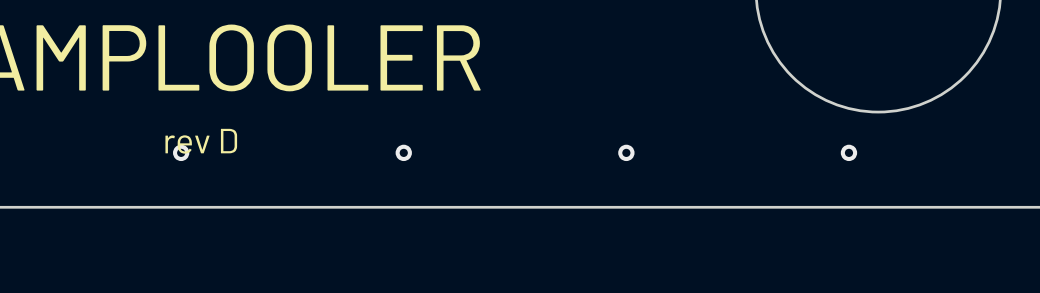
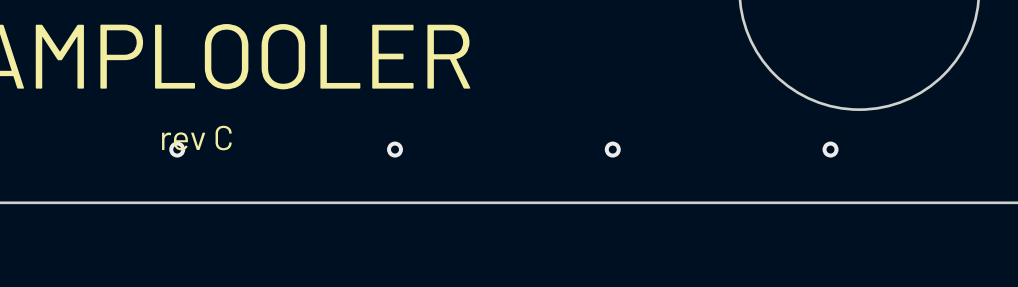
text: rev D (201, 141) -> rev C (196, 138)

